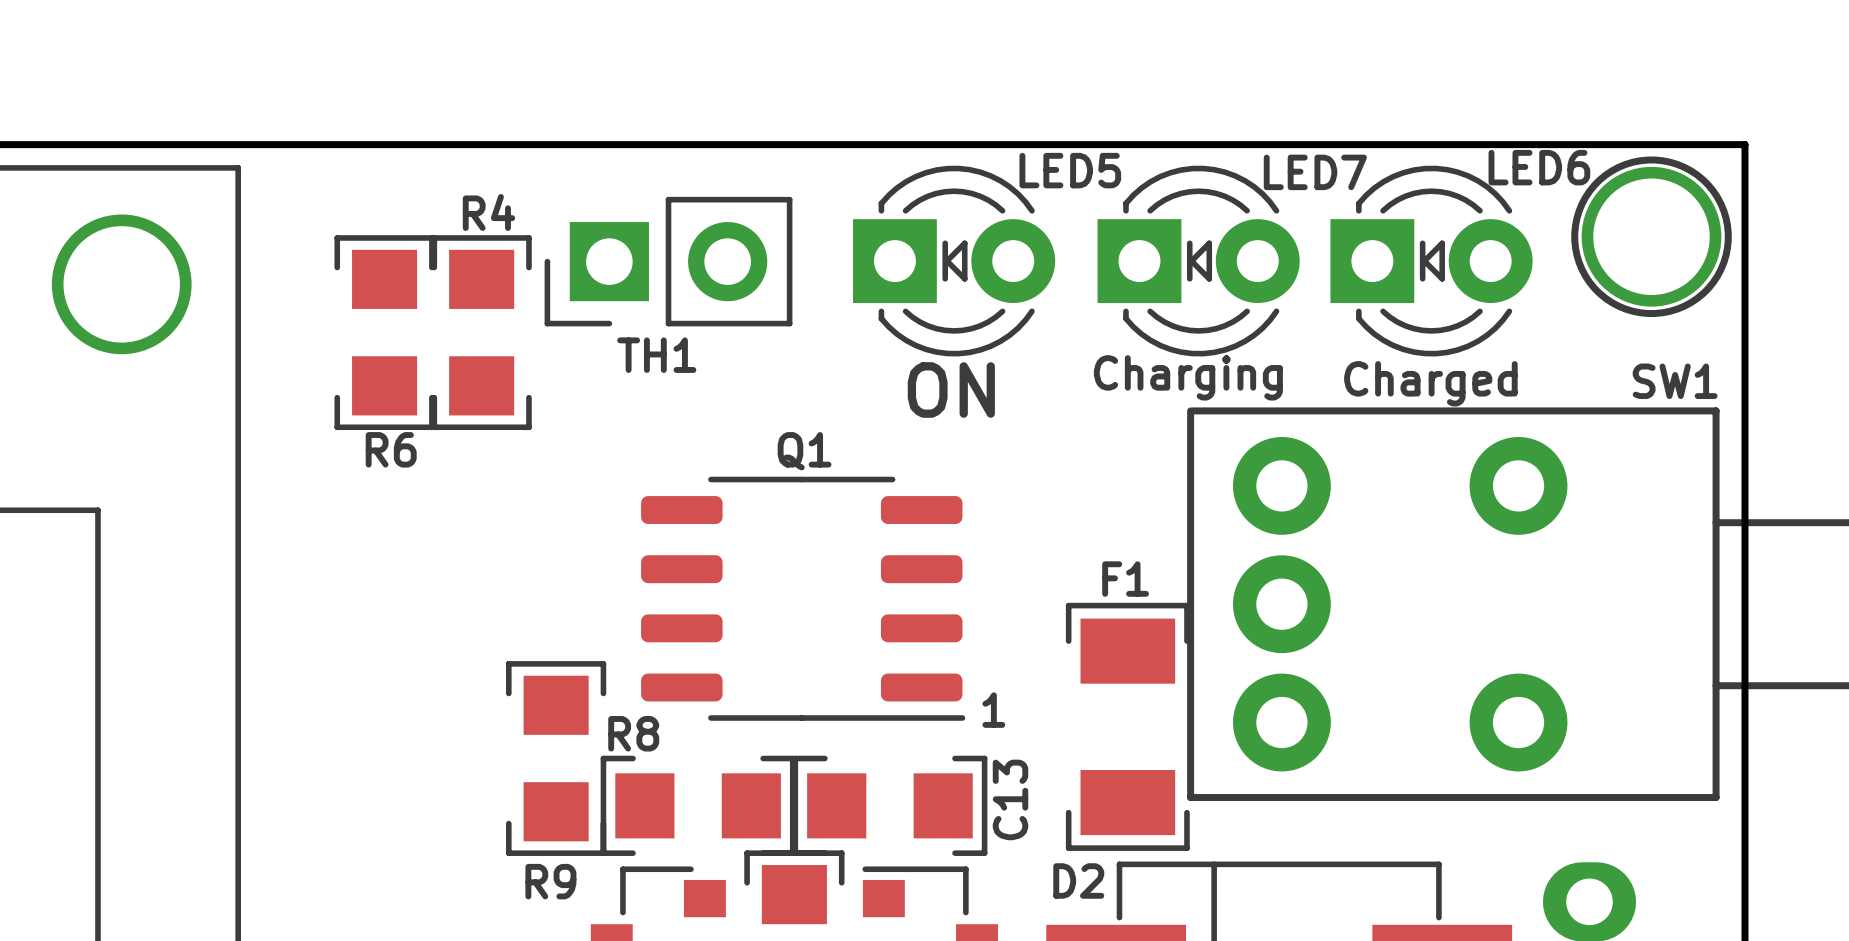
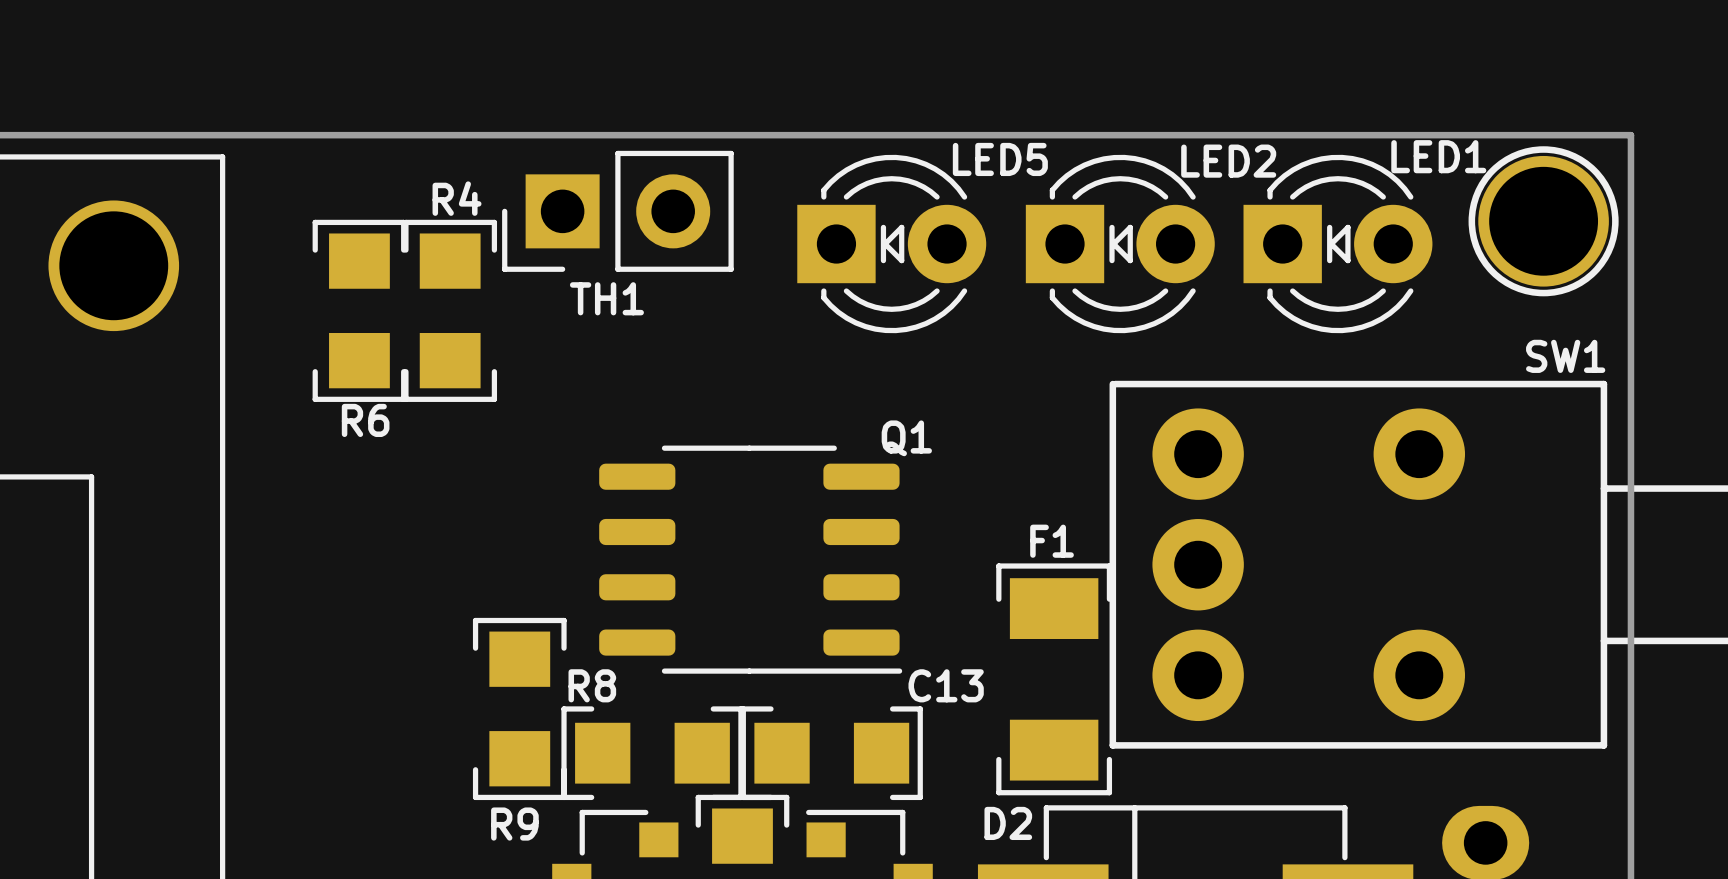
LED6 name: LED6 (1539, 167) -> LED1 (1438, 156)
LED7 name: LED7 (1315, 172) -> LED2 (1228, 161)
TH1 position: (668, 261) -> (617, 211)
text: Charging (1188, 377) -> none
text: Charged (1430, 383) -> none
text: ON (951, 390) -> none
Q1 name position: Q1 (804, 451) -> Q1 (906, 438)
text: 1 (993, 710) -> none
C13 name rotation: 0° (1010, 799) -> 90° clockwise (946, 685)

